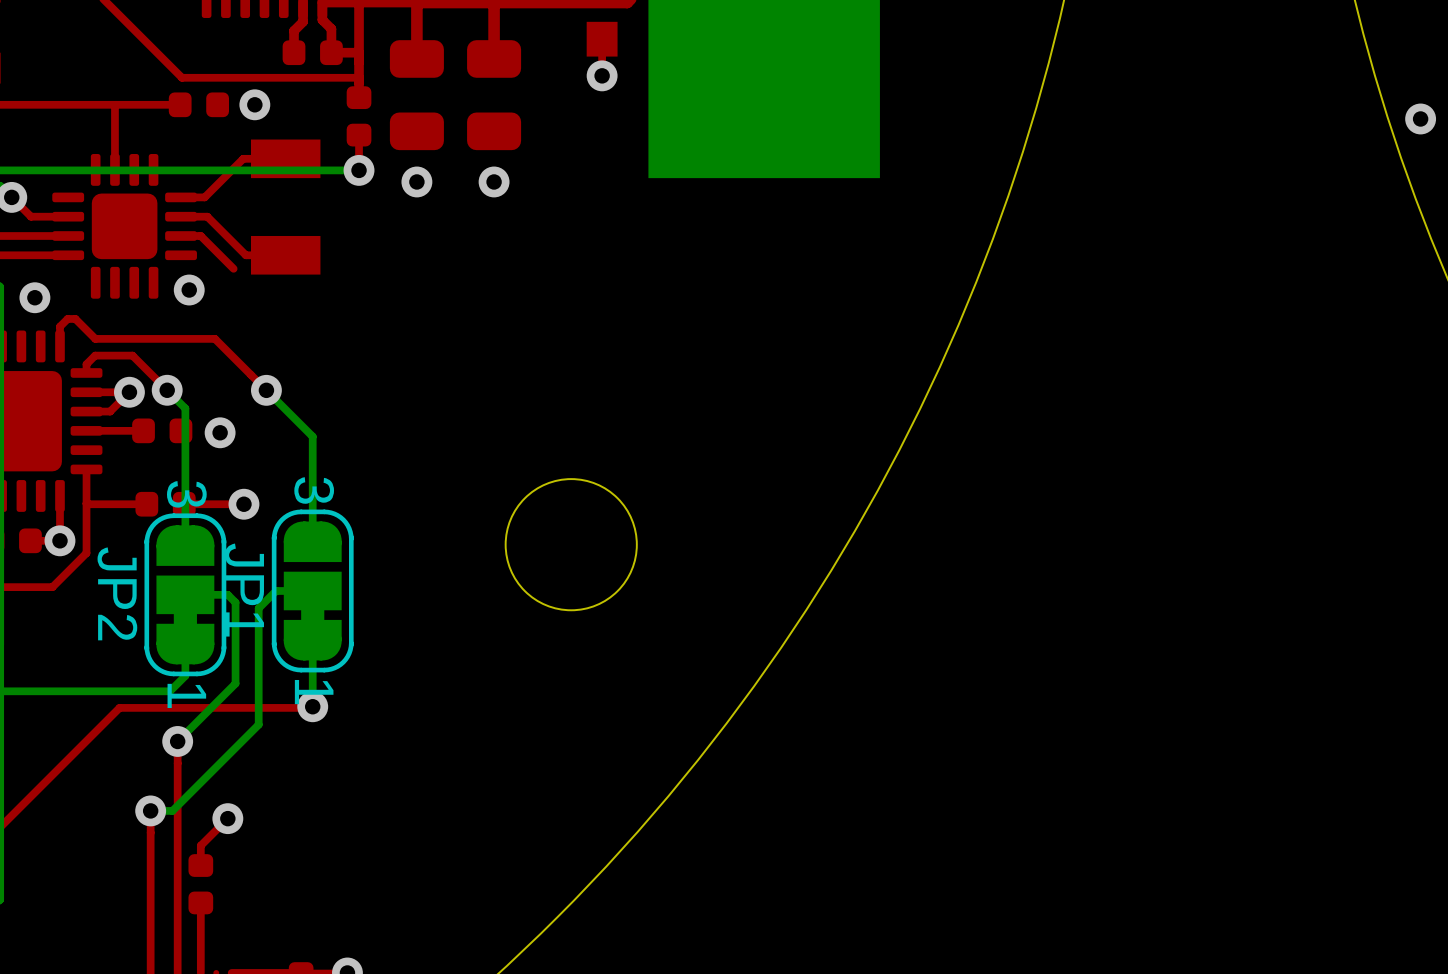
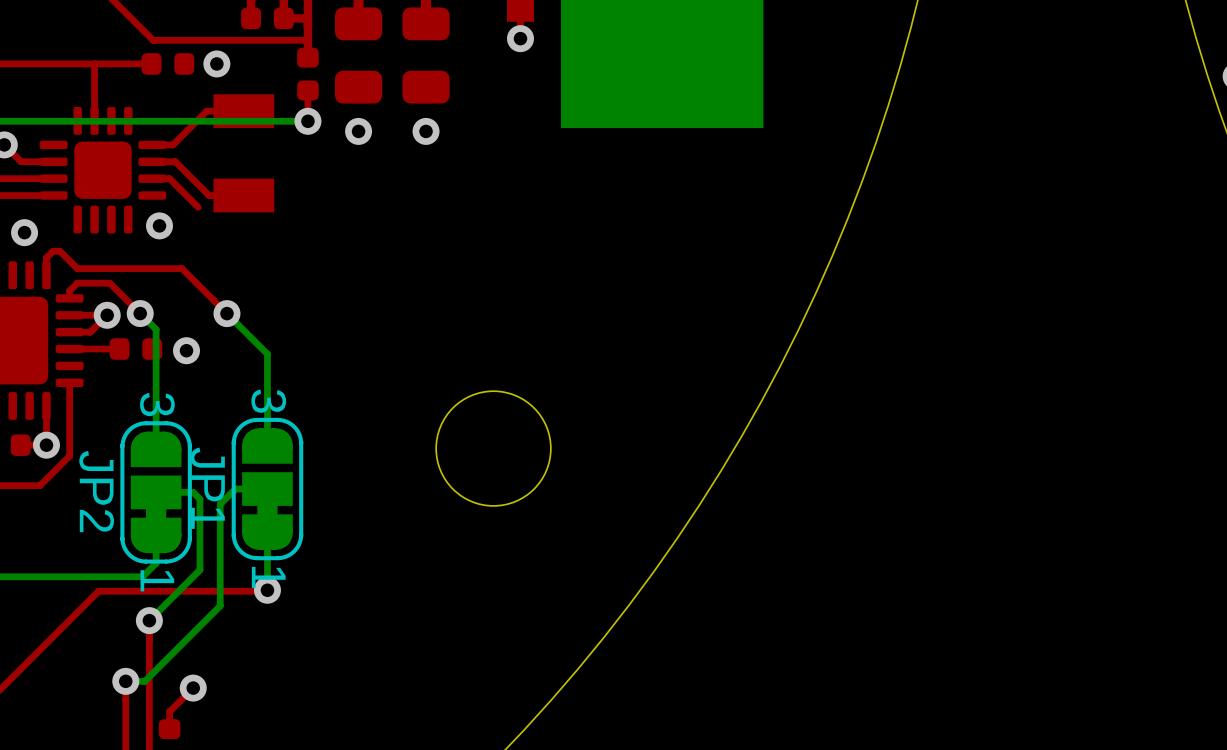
top track: (86, 503) (146, 504) -> none
part: (165, 504) -> none
top track: (243, 504) (184, 504) -> none
via: (243, 504) -> none

